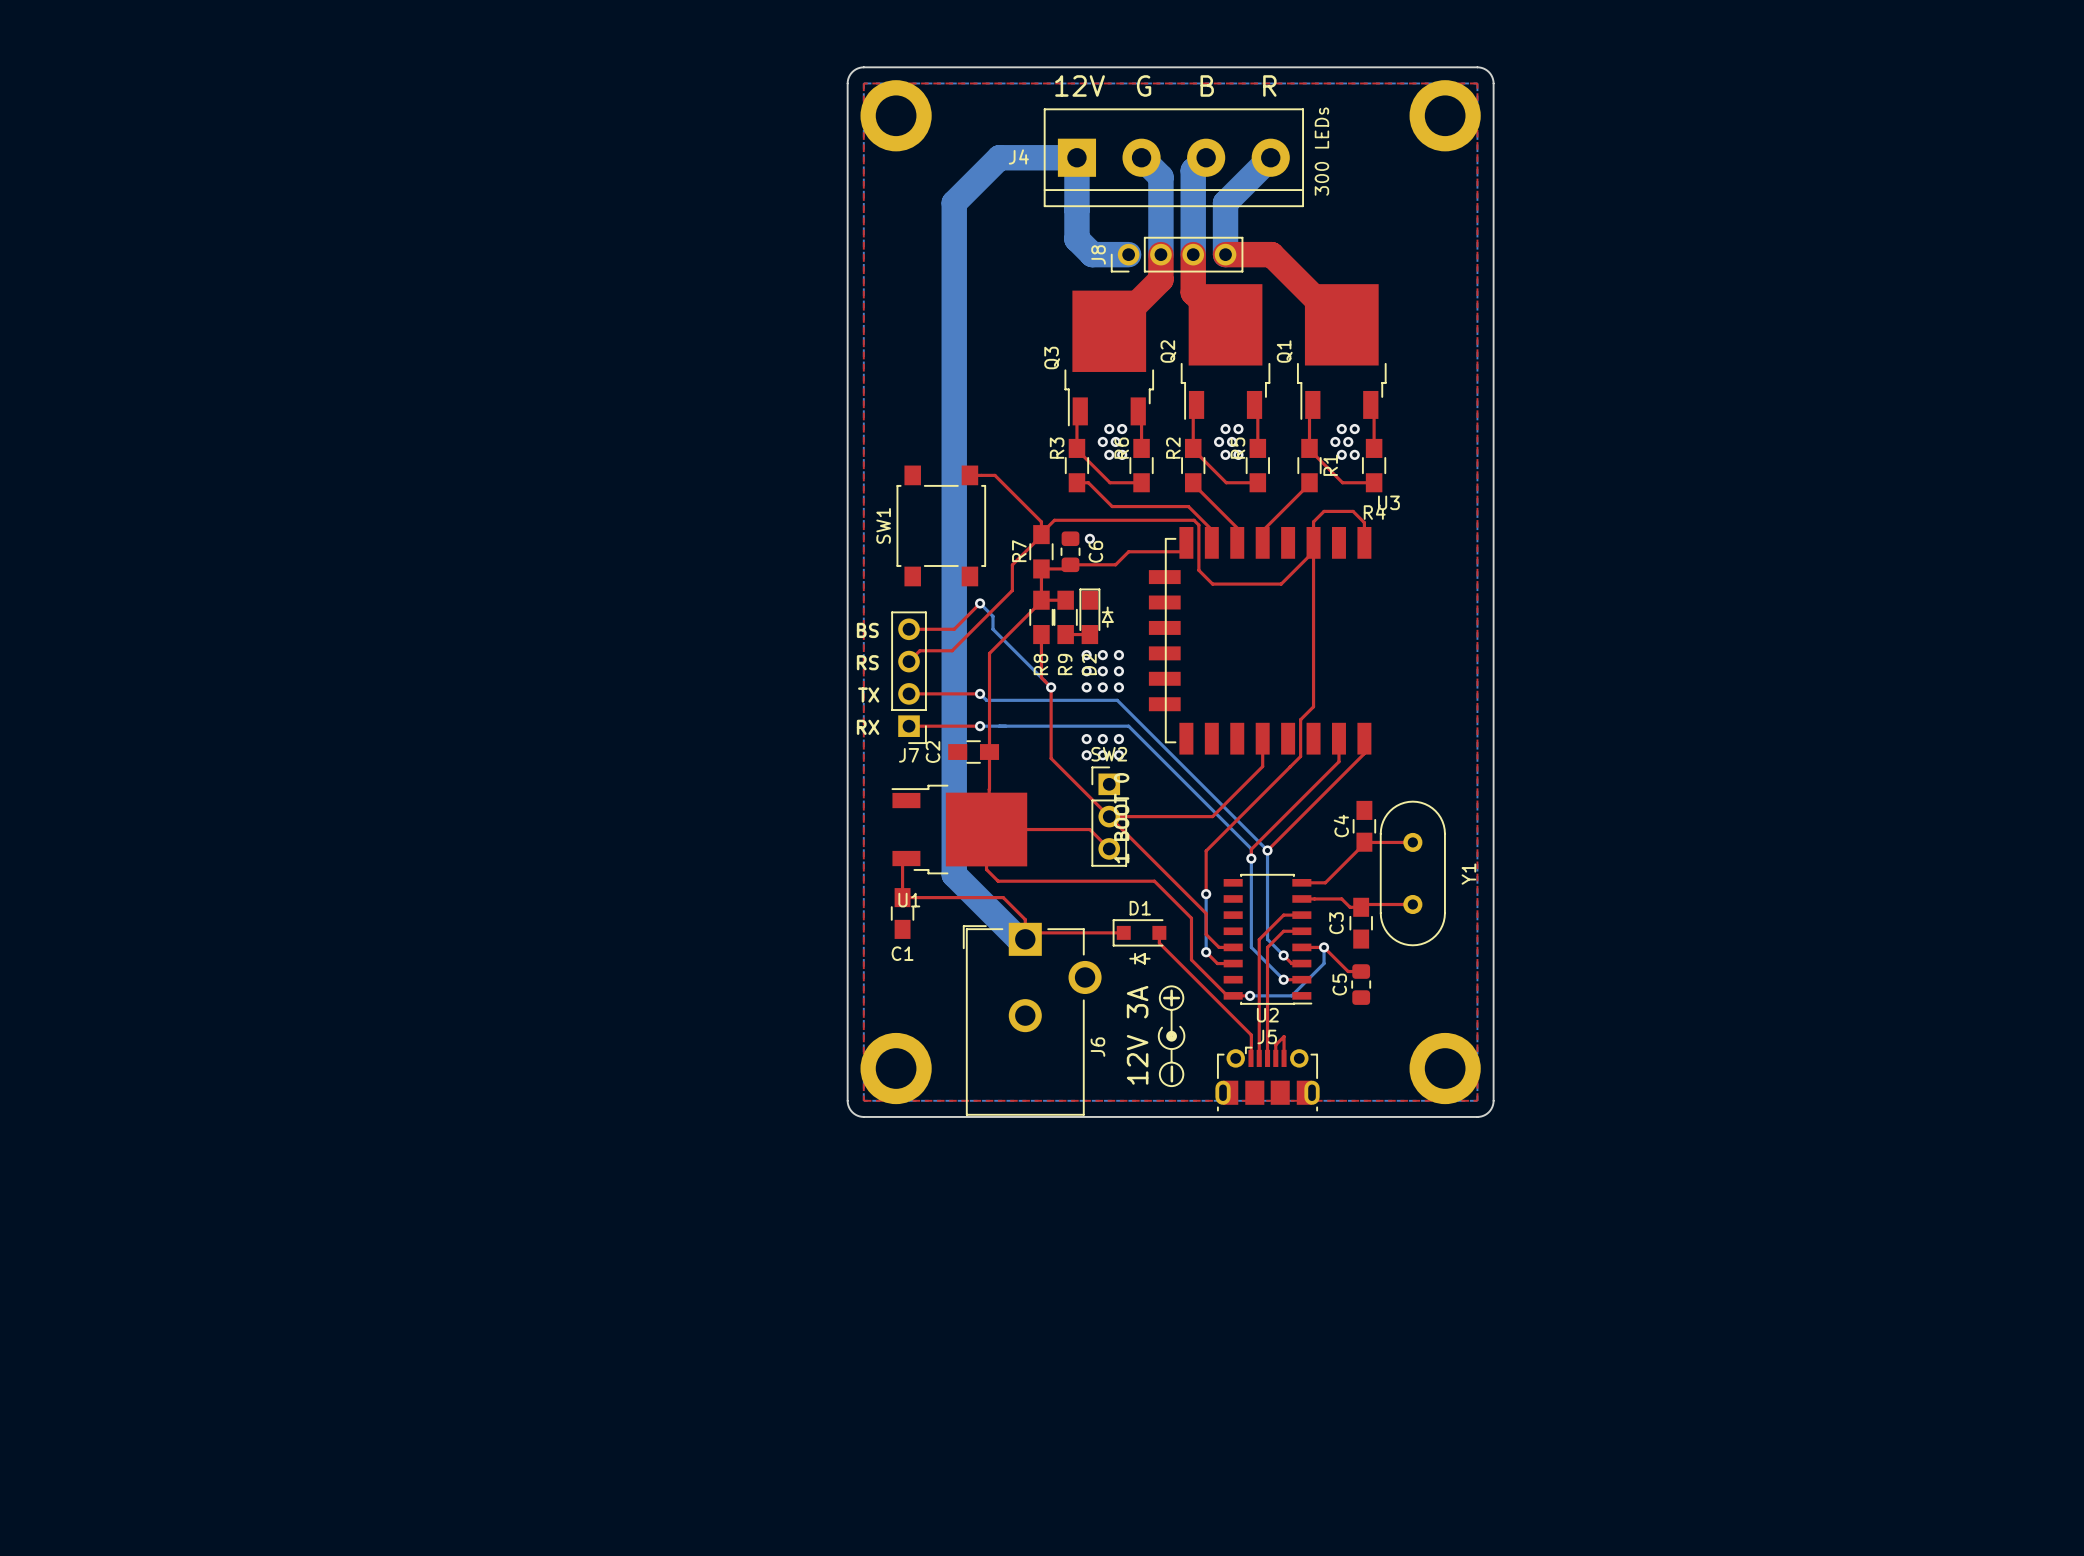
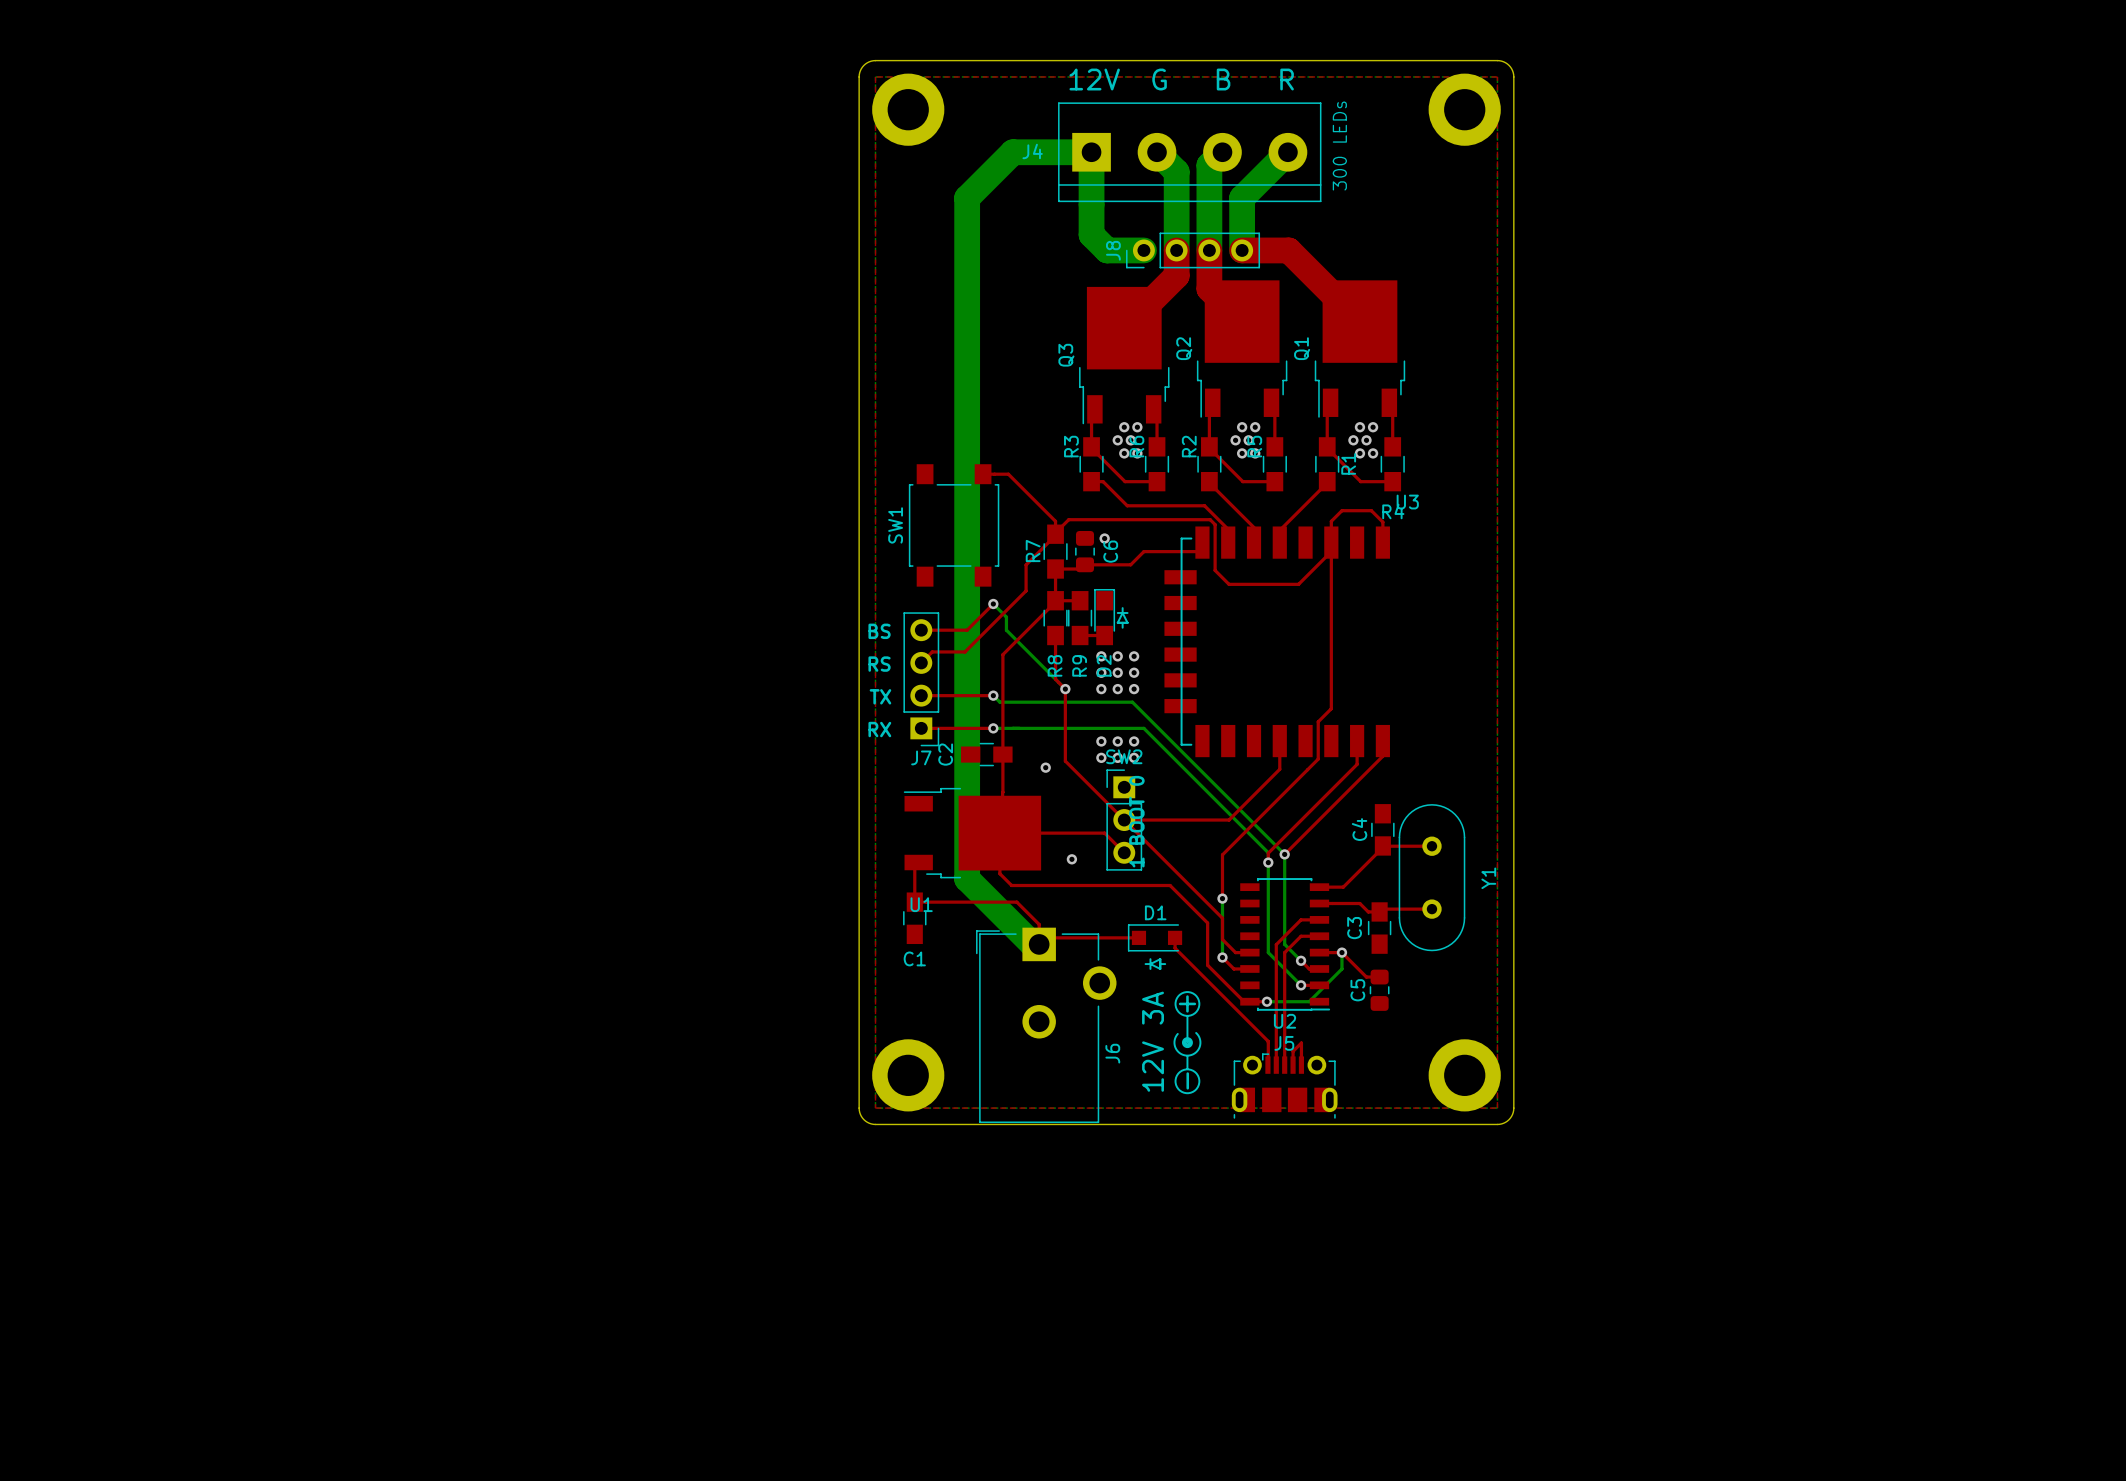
via: none -> (1045, 767)
via: none -> (1071, 859)

